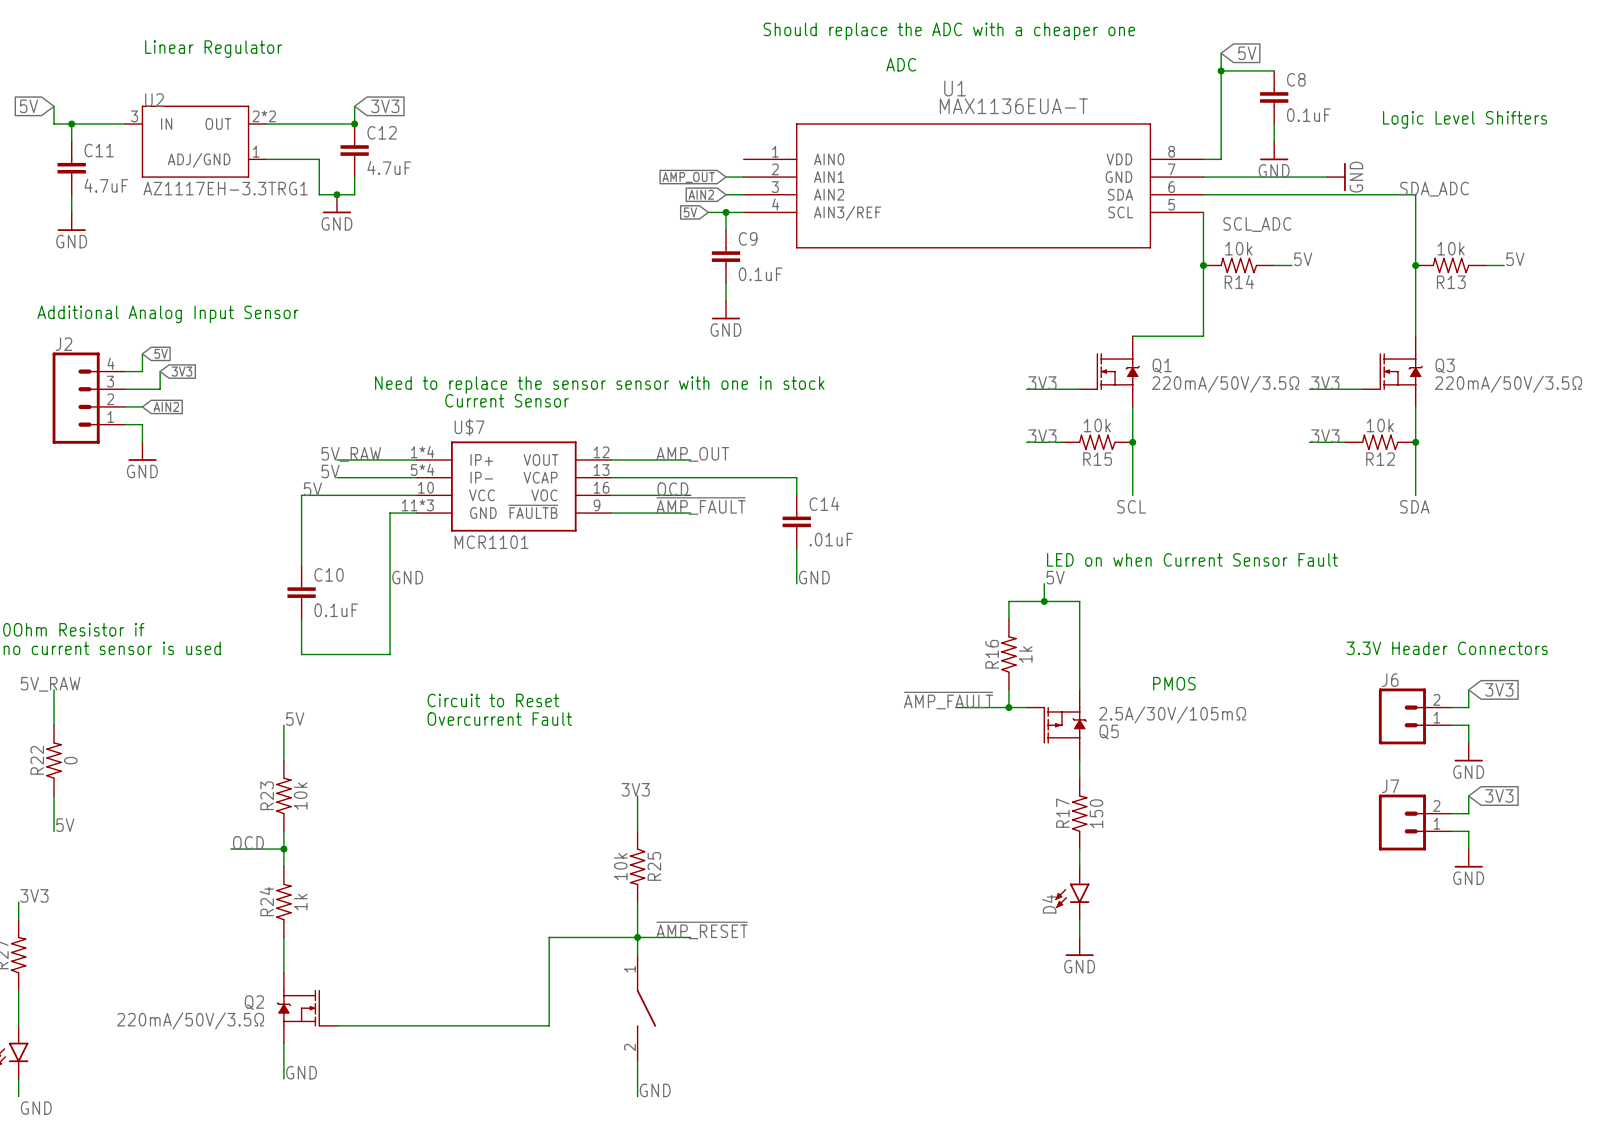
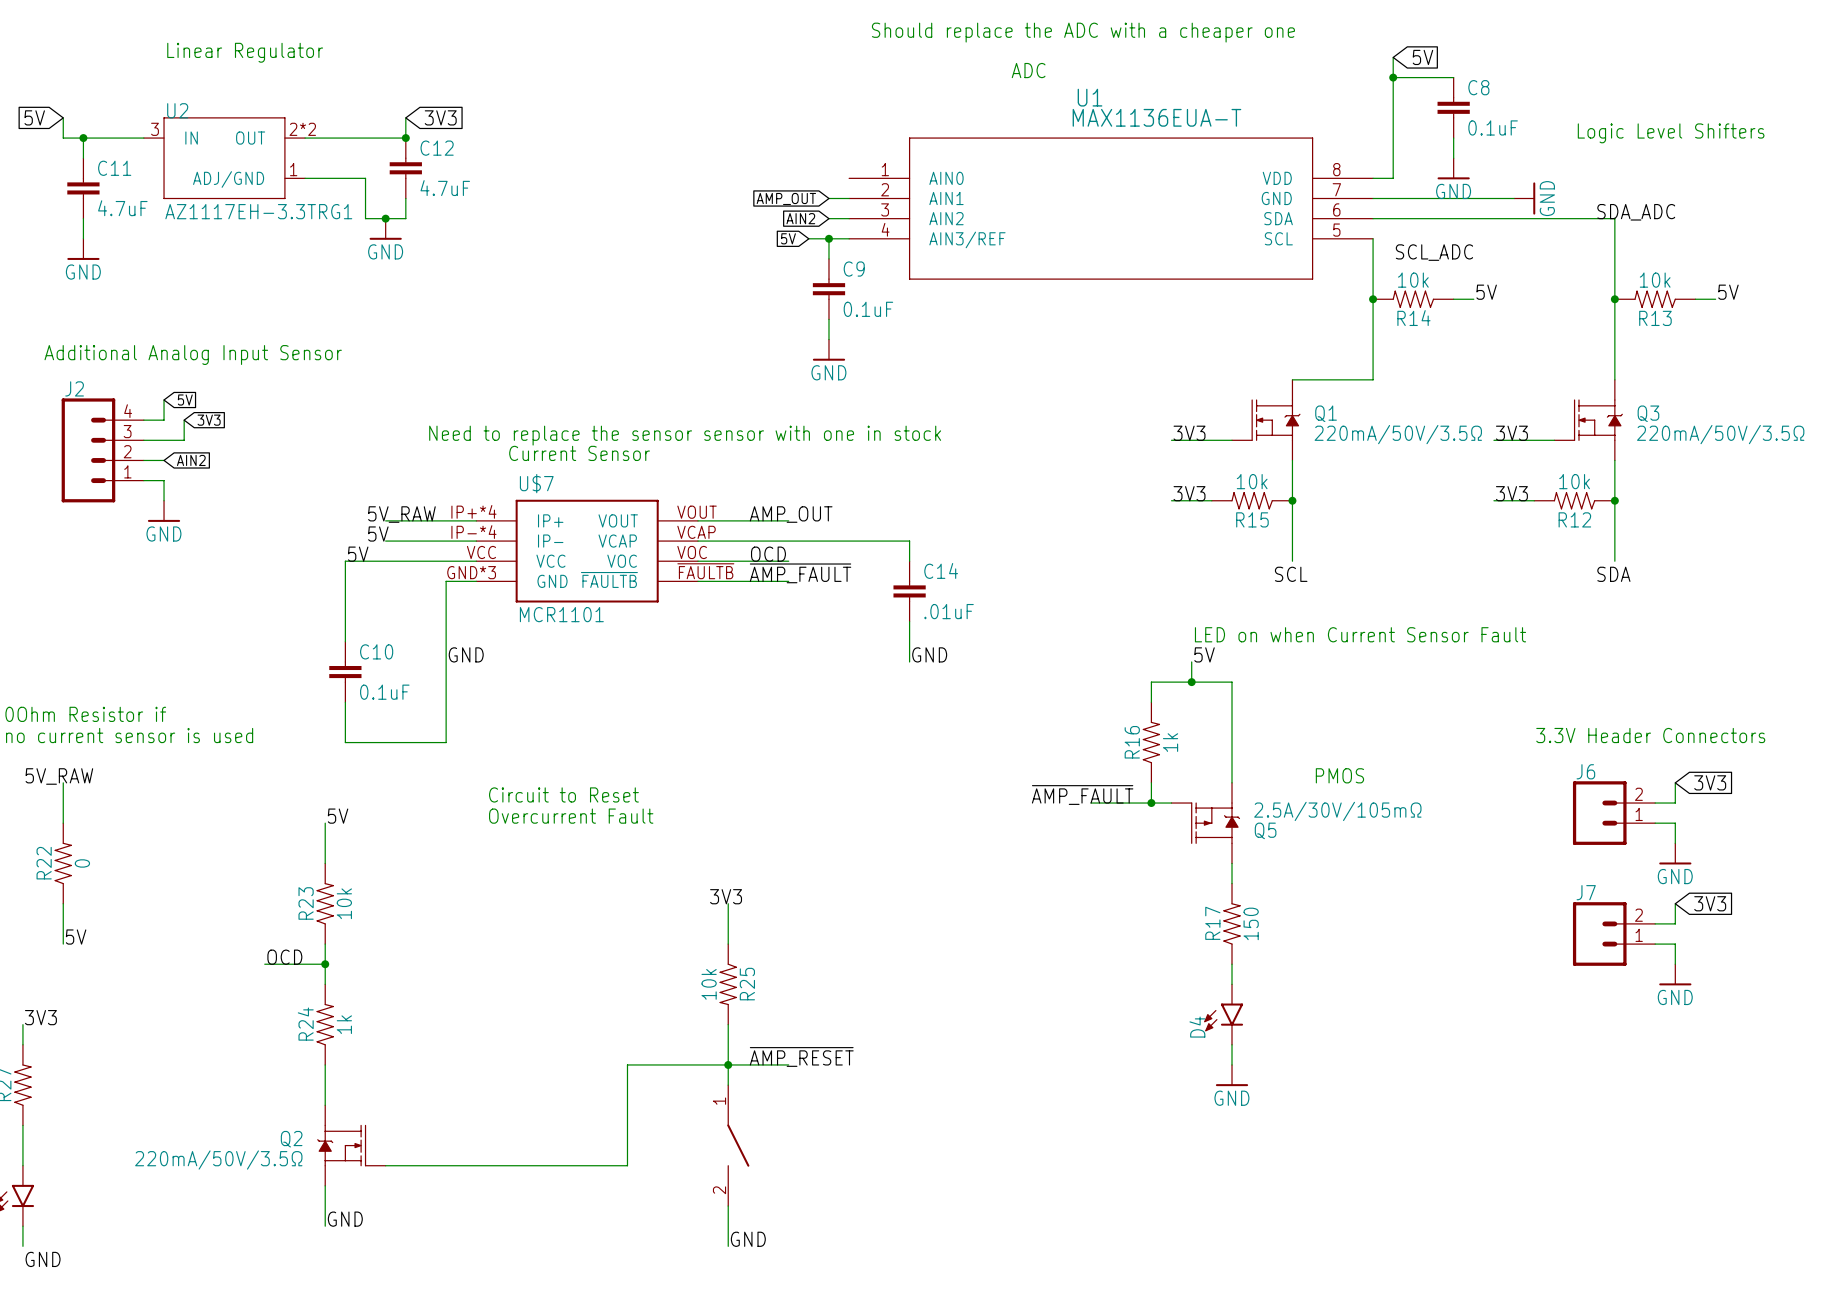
U$7 pin number: 1*4 (422, 452) -> IP+*4 (473, 511)
U$7 pin number: 12 (601, 452) -> VOUT (697, 512)
U$7 pin number: 5*4 (422, 469) -> IP-*4 (473, 532)
U$7 pin number: 13 (601, 470) -> VCAP (696, 532)
U$7 pin number: 10 (426, 487) -> VCC (481, 552)
U$7 pin number: 16 (601, 487) -> VOC (692, 552)
U$7 pin number: 11*3 (417, 505) -> GND*3 (471, 572)
U$7 pin number: 9 (597, 505) -> ~{FAULTB} (705, 571)

